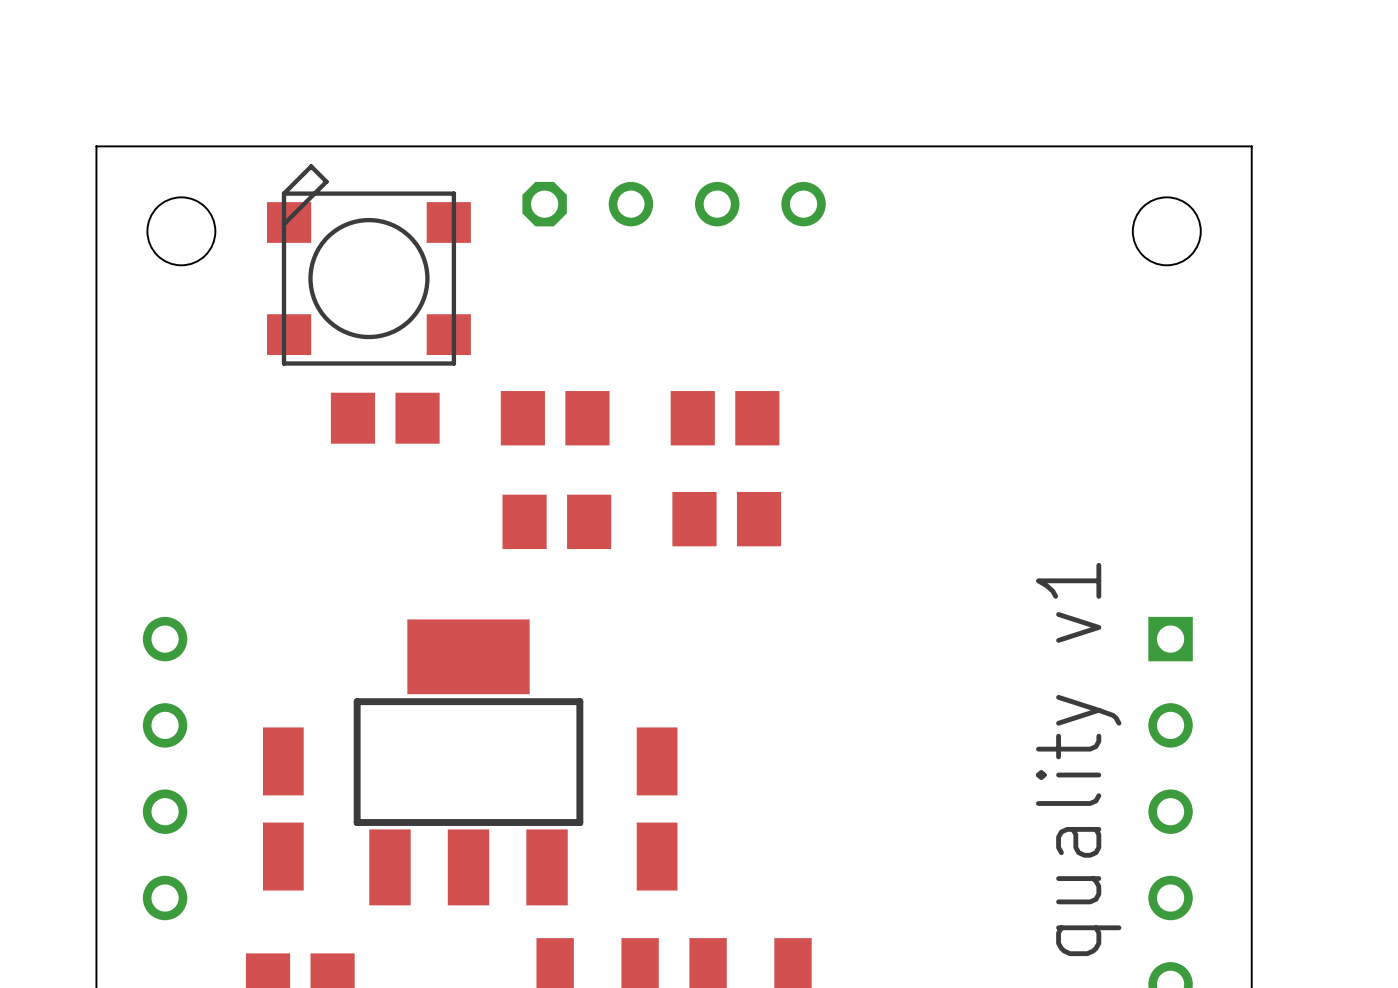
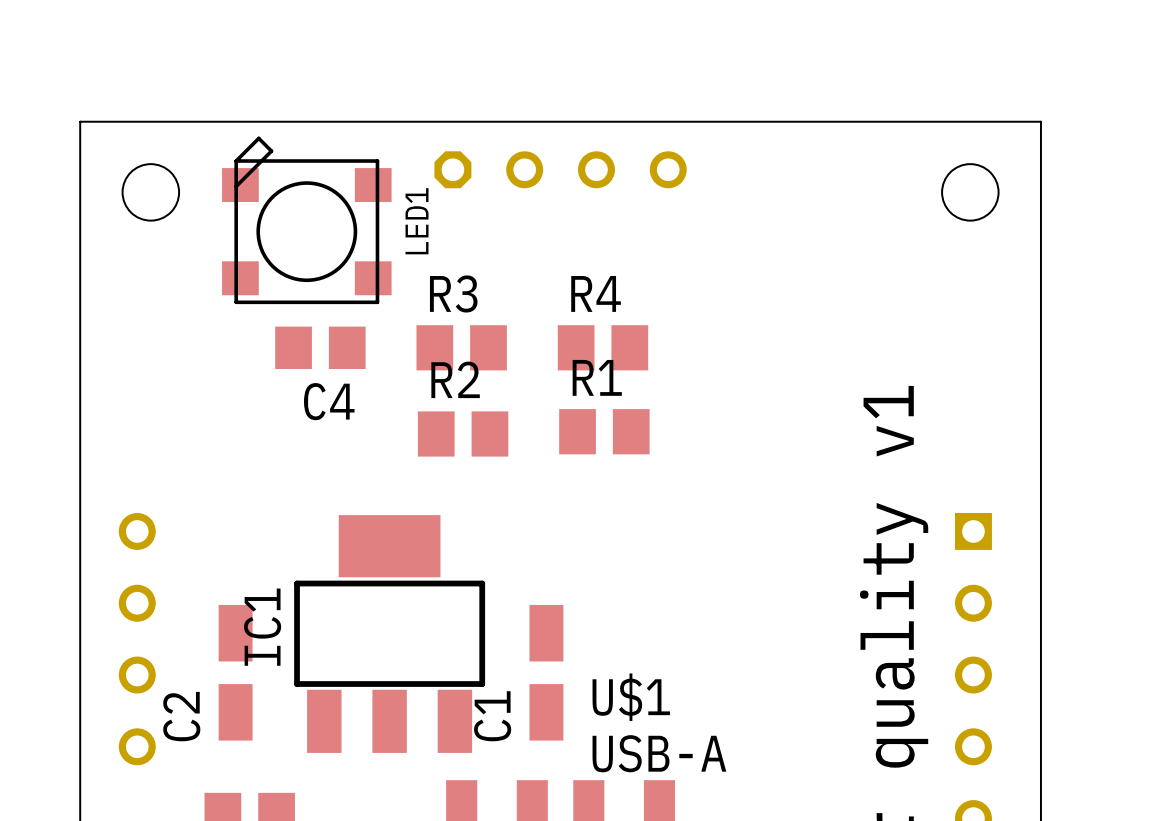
LED1 name: none -> LED1 (417, 221)
R4 name: none -> R4 (596, 293)
R3 name: none -> R3 (453, 293)
R1 name: none -> R1 (597, 377)
R2 name: none -> R2 (455, 379)
C4 name: none -> C4 (329, 401)
IC1 name: none -> IC1 (262, 627)
U$1 name: none -> U$1 (631, 697)
C2 name: none -> C2 (181, 716)
C1 name: none -> C1 (492, 716)
U$1 value: none -> USB-A (659, 753)

